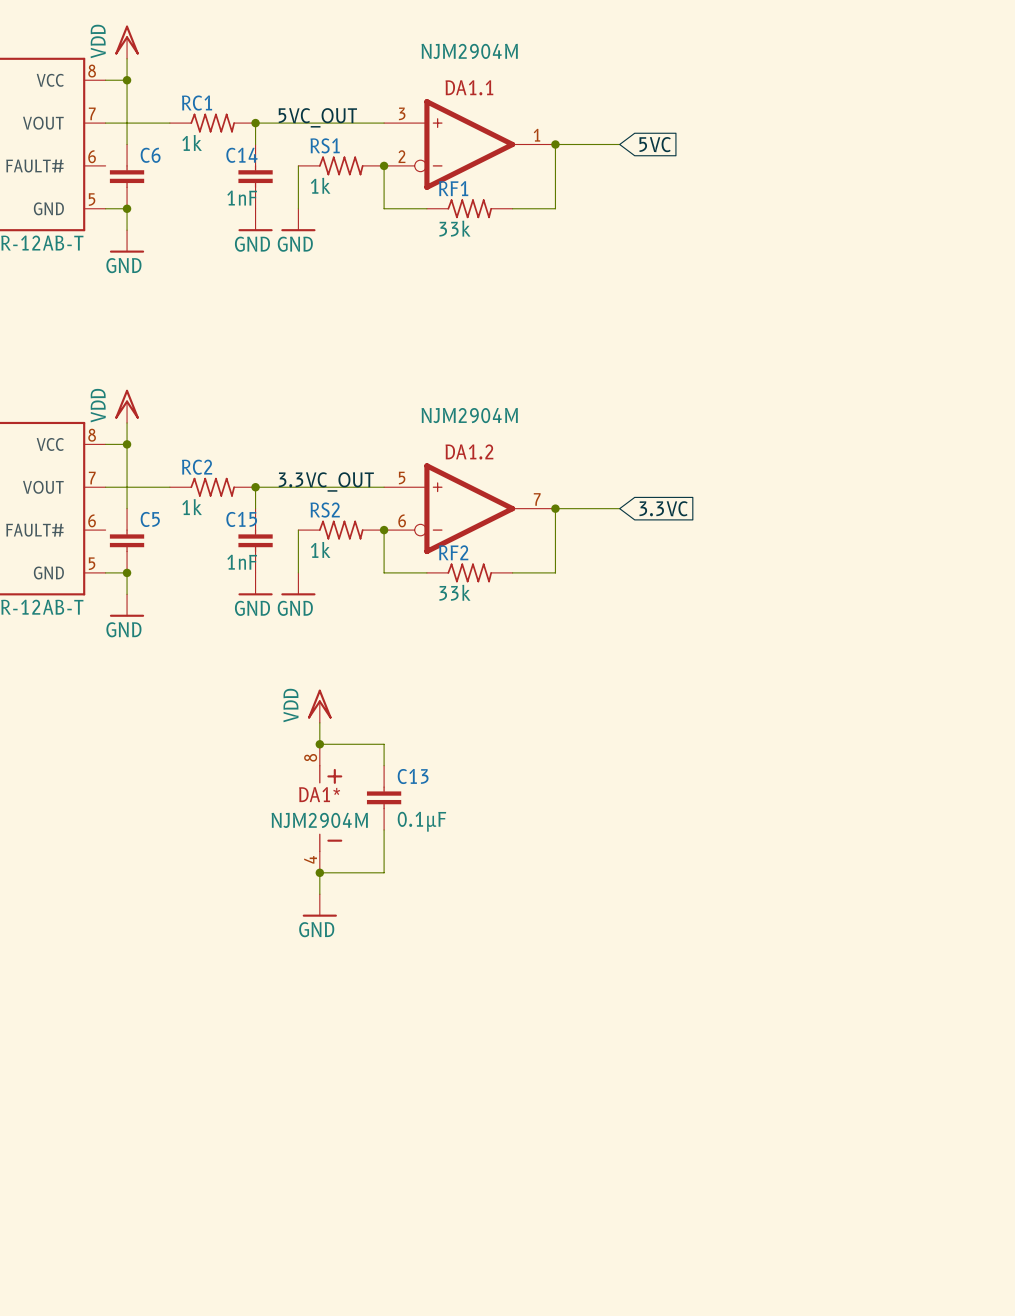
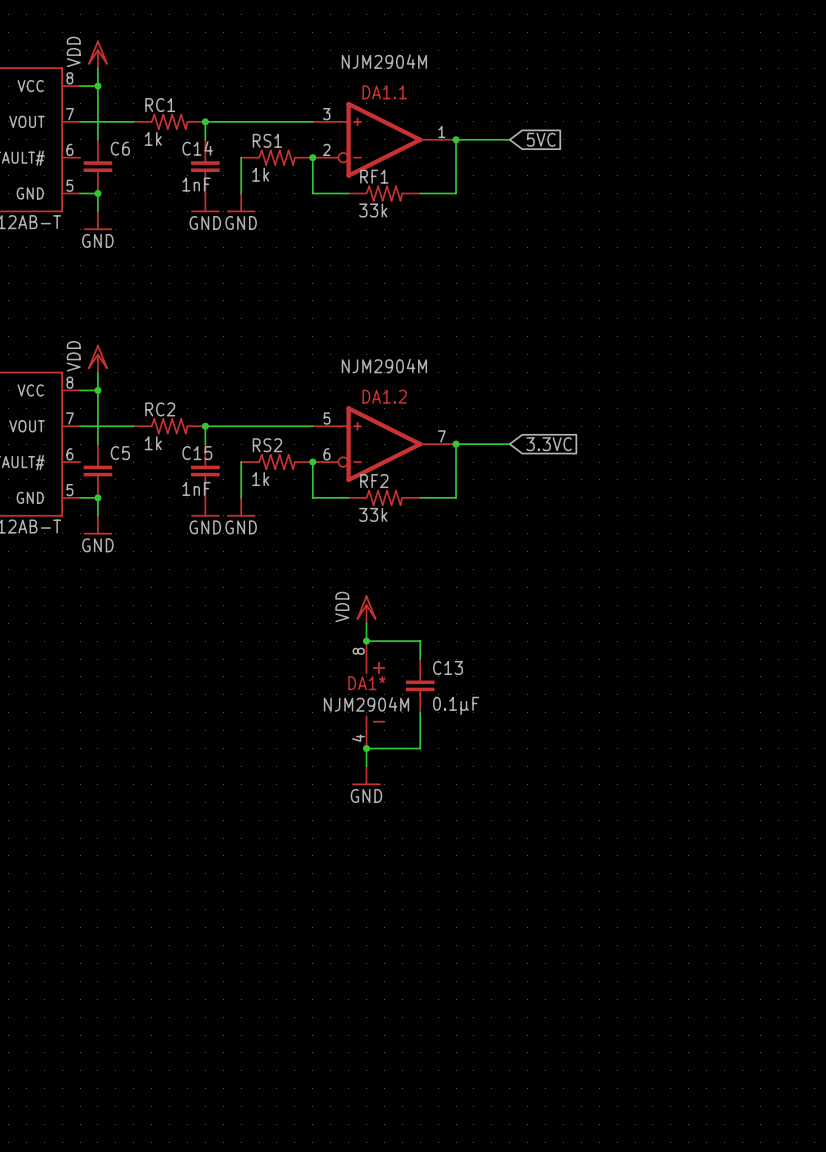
label: 5VC_OUT (317, 117) -> none
label: 3.3VC_OUT (326, 481) -> none
power symbol position: VDD (319, 706) -> VDD (366, 609)
wire: (319, 722) (319, 744) (384, 744) (384, 765) -> (366, 623) (366, 641) (420, 641) (420, 659)
junction: (319, 744) -> none
junction: none -> (366, 641)
C13 position: (384, 797) -> (420, 685)
DA1* position: (330, 808) -> (375, 694)
wire: (384, 829) (384, 872) (319, 872) (319, 894) -> (420, 712) (420, 748) (366, 748) (366, 766)
junction: (319, 872) -> none
junction: none -> (366, 748)
power symbol position: GND (319, 905) -> GND (366, 775)

